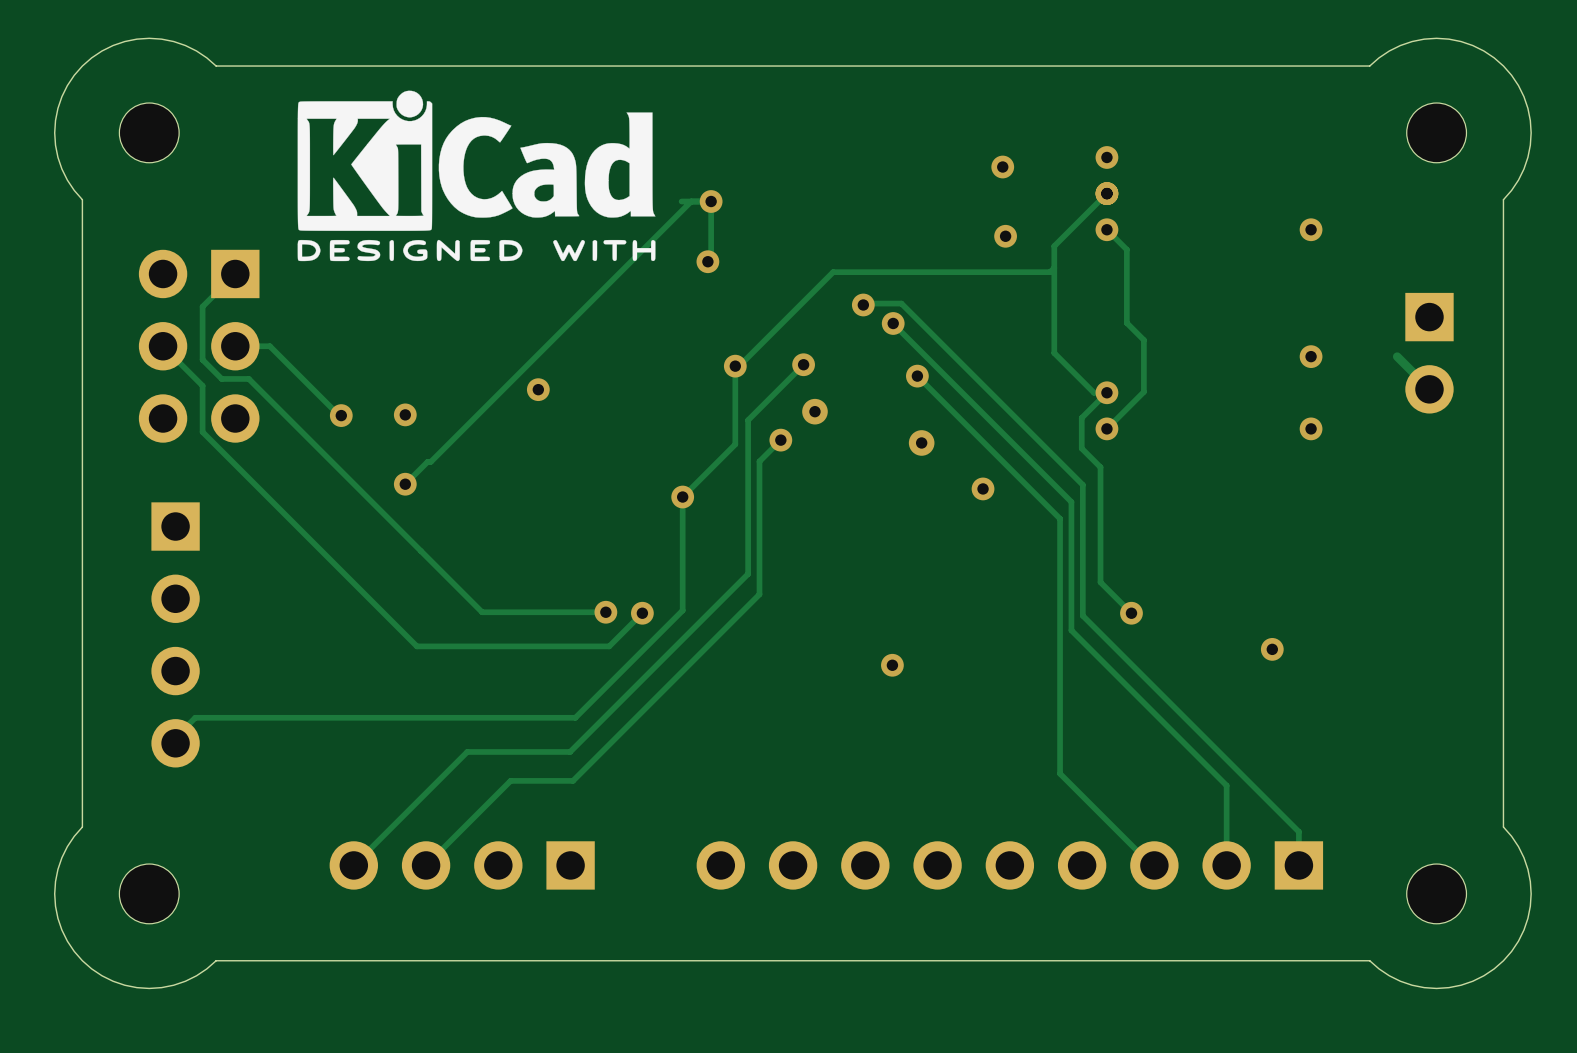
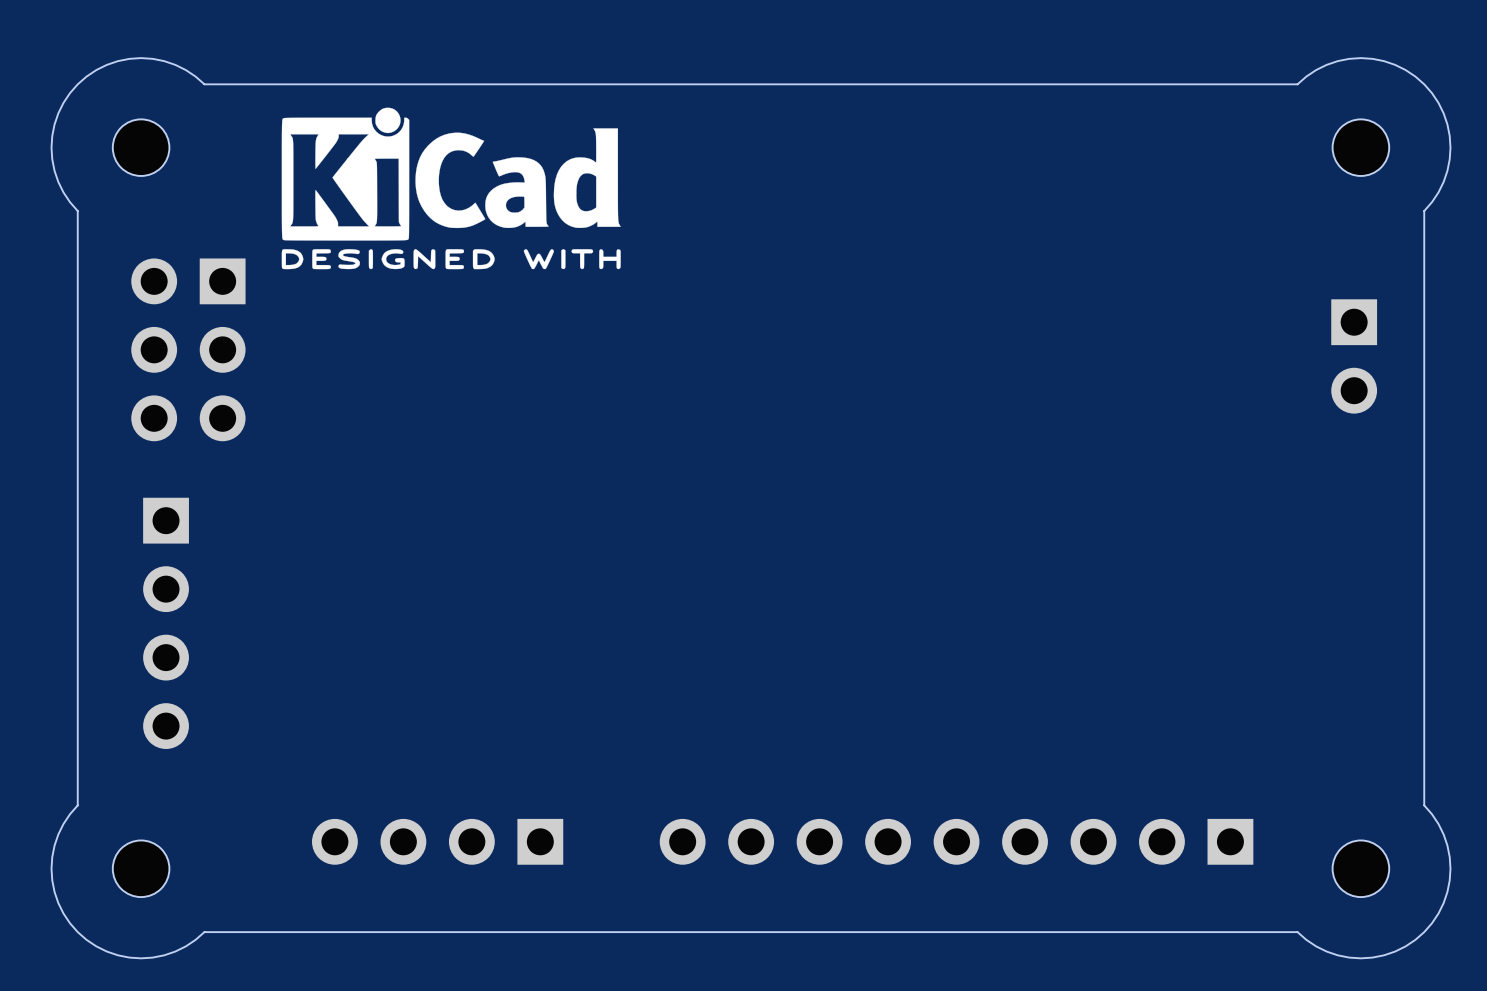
via: (1106, 157) -> none
via: (1002, 167) -> none
track: (1106, 193) (1054, 246) (1054, 353) (1093, 392) (1106, 392) (1081, 417) (1081, 448) (1100, 467) (1100, 582) (1131, 613) -> none
via: (1106, 193) -> none
track: (681, 201) (711, 201) (711, 258) (707, 261) -> none
track: (691, 201) (430, 461) (427, 461) (405, 484) -> none
via: (711, 201) -> none
track: (1106, 229) (1126, 249) (1126, 323) (1143, 340) (1143, 391) (1106, 428) -> none
via: (1106, 229) -> none
via: (1311, 229) -> none
via: (1005, 236) -> none
via: (707, 261) -> none
track: (1054, 268) (1050, 272) (833, 272) (739, 366) (735, 366) (735, 444) (682, 497) (682, 610) (575, 717) (195, 717) (175, 737) (175, 743) -> none
track: (235, 273) (202, 306) (202, 359) (221, 378) (248, 378) (482, 612) (605, 612) -> none
track: (863, 304) (901, 303) (1082, 484) (1082, 615) (1298, 831) (1298, 868) -> none
via: (863, 304) -> none
track: (893, 323) (1071, 502) (1071, 630) (1226, 785) (1226, 868) -> none
via: (893, 323) -> none
track: (163, 346) (202, 385) (202, 432) (416, 646) (609, 646) (642, 613) -> none
track: (235, 346) (269, 346) (341, 415) -> none
via: (1311, 356) -> none
track: (1397, 356) (1429, 389) -> none
track: (803, 364) (748, 420) (748, 573) (570, 751) (467, 751) (353, 865) -> none
via: (803, 364) -> none
via: (735, 366) -> none
track: (917, 376) (1060, 518) (1060, 773) (1154, 868) -> none
via: (917, 376) -> none
via: (538, 389) -> none
via: (1106, 392) -> none
via: (814, 411) -> none
via: (405, 414) -> none
via: (341, 415) -> none
via: (1106, 428) -> none
via: (1311, 428) -> none
track: (780, 440) (759, 461) (759, 594) (573, 780) (510, 780) (426, 865) -> none
via: (780, 440) -> none
via: (921, 442) -> none
via: (405, 484) -> none
via: (983, 488) -> none
via: (682, 497) -> none
via: (605, 612) -> none
via: (642, 613) -> none
via: (1131, 613) -> none
via: (1272, 649) -> none
via: (892, 665) -> none

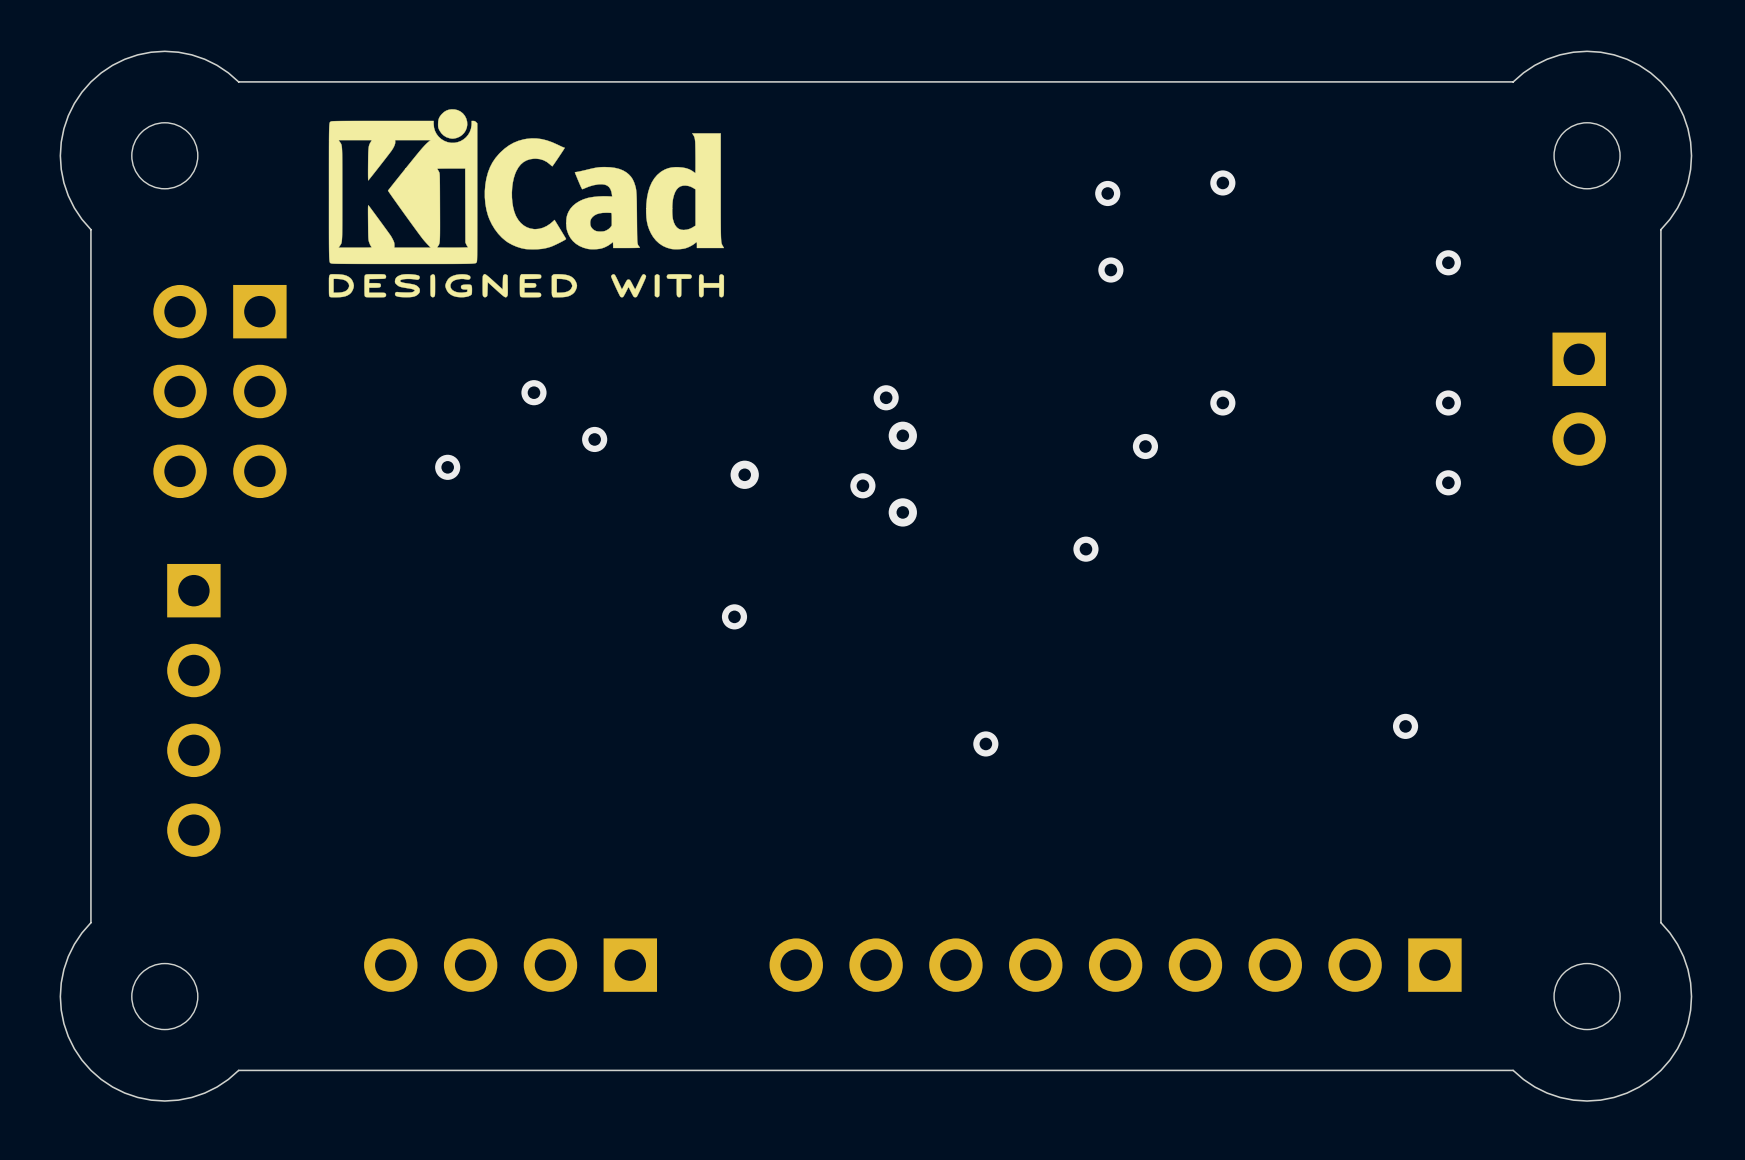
via: none -> (1222, 182)
via: none -> (1107, 193)
via: none -> (1448, 262)
via: none -> (1110, 270)
via: none -> (533, 392)
via: none -> (886, 397)
via: none -> (1222, 402)
via: none -> (1448, 402)
via: none -> (902, 435)
via: none -> (594, 439)
via: none -> (1145, 446)
via: none -> (447, 467)
via: none -> (744, 474)
via: none -> (1448, 482)
via: none -> (862, 485)
via: none -> (902, 512)
via: none -> (1085, 549)
via: none -> (734, 616)
via: none -> (1405, 726)
via: none -> (985, 743)

